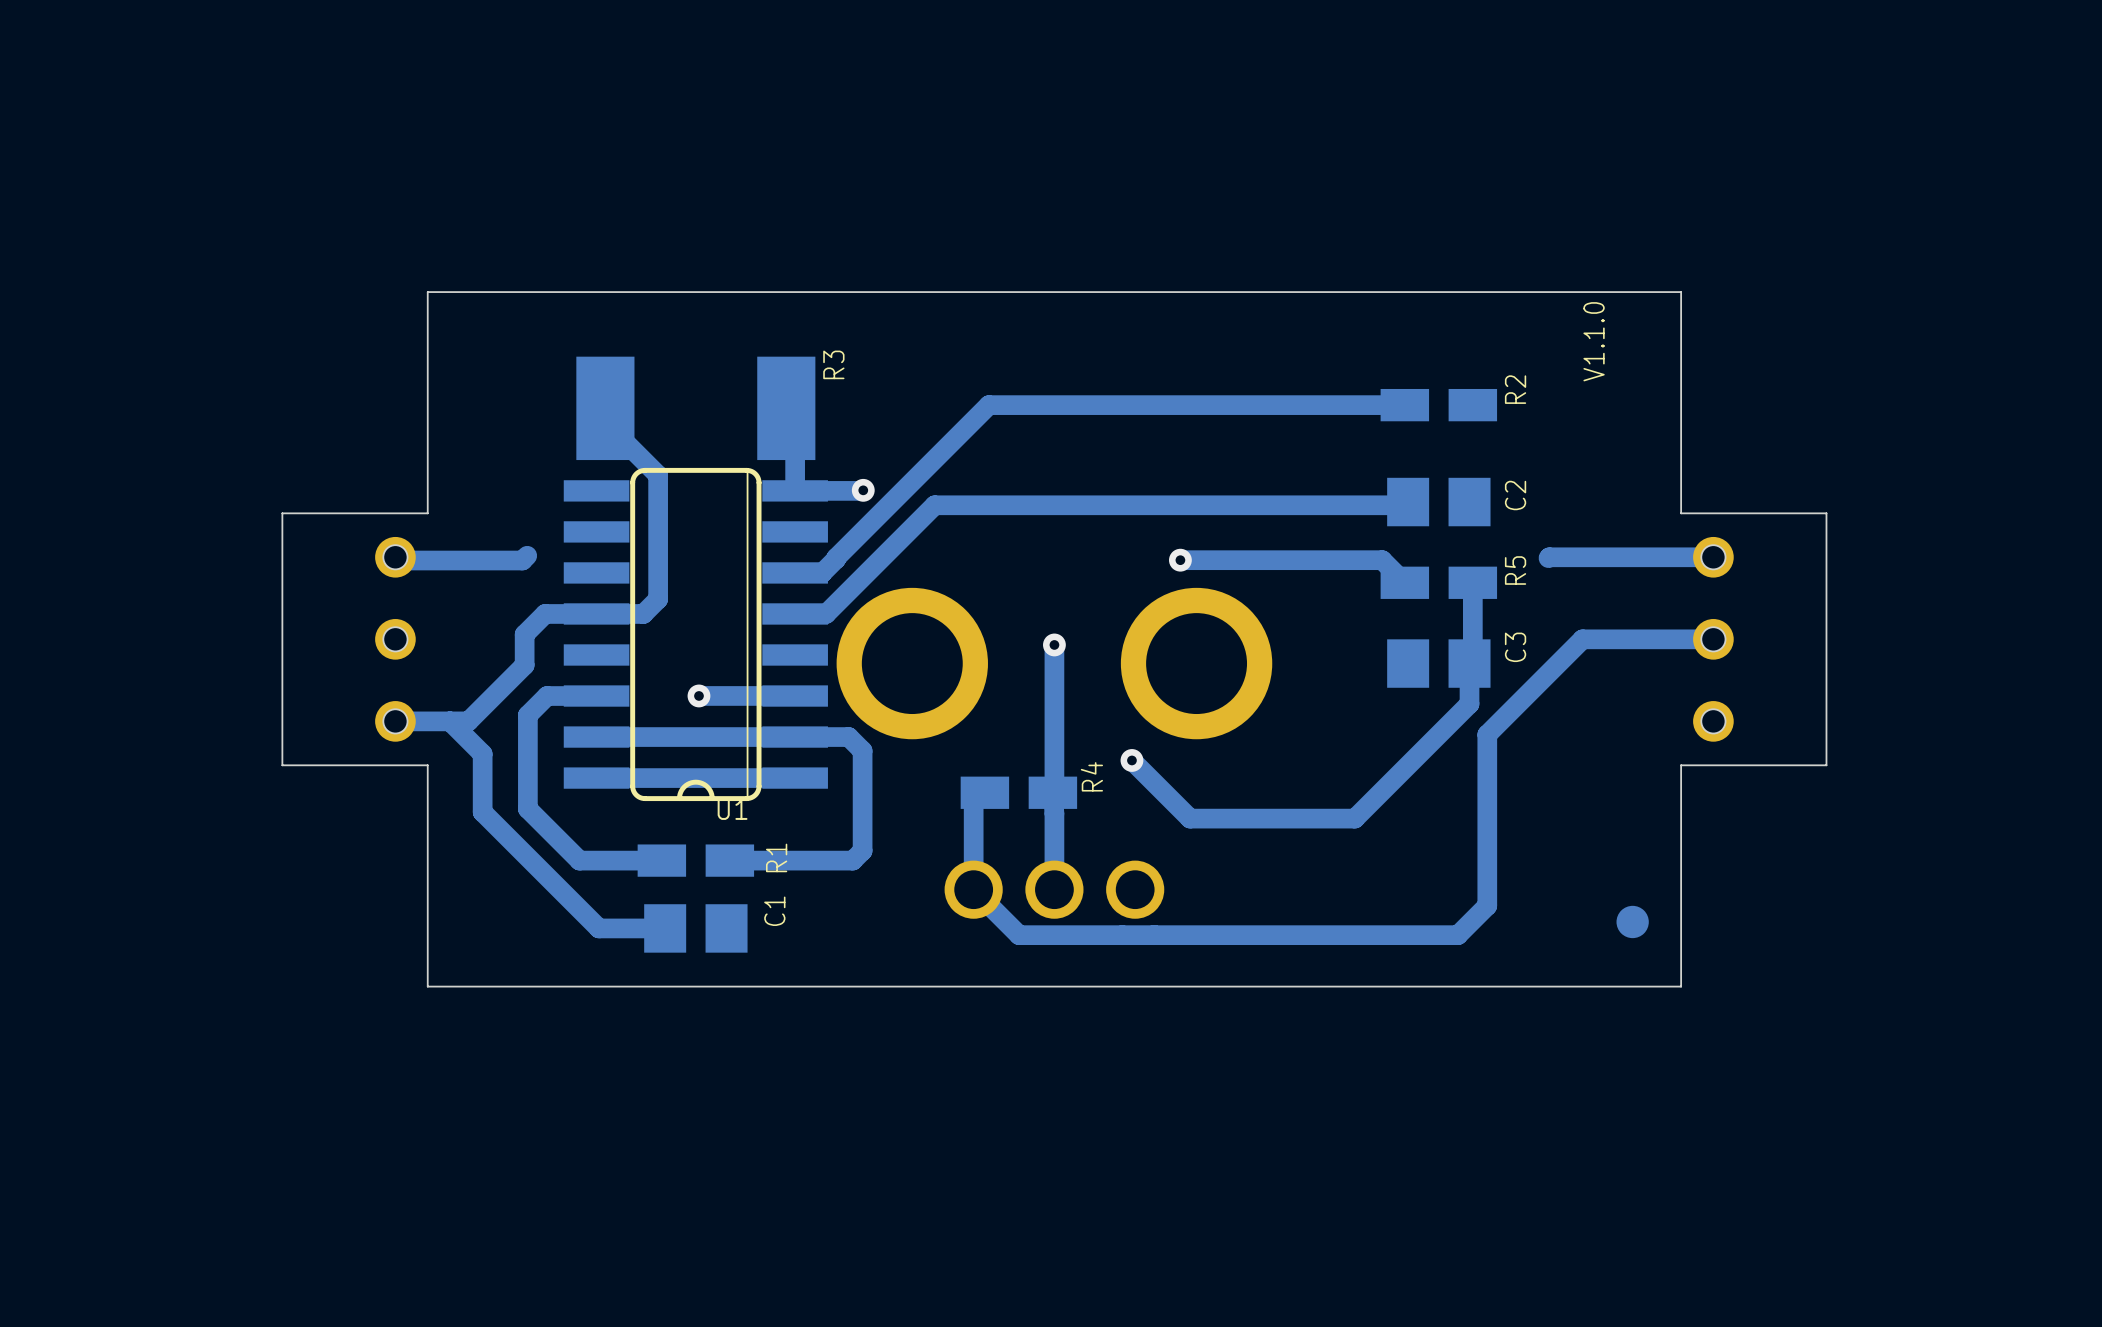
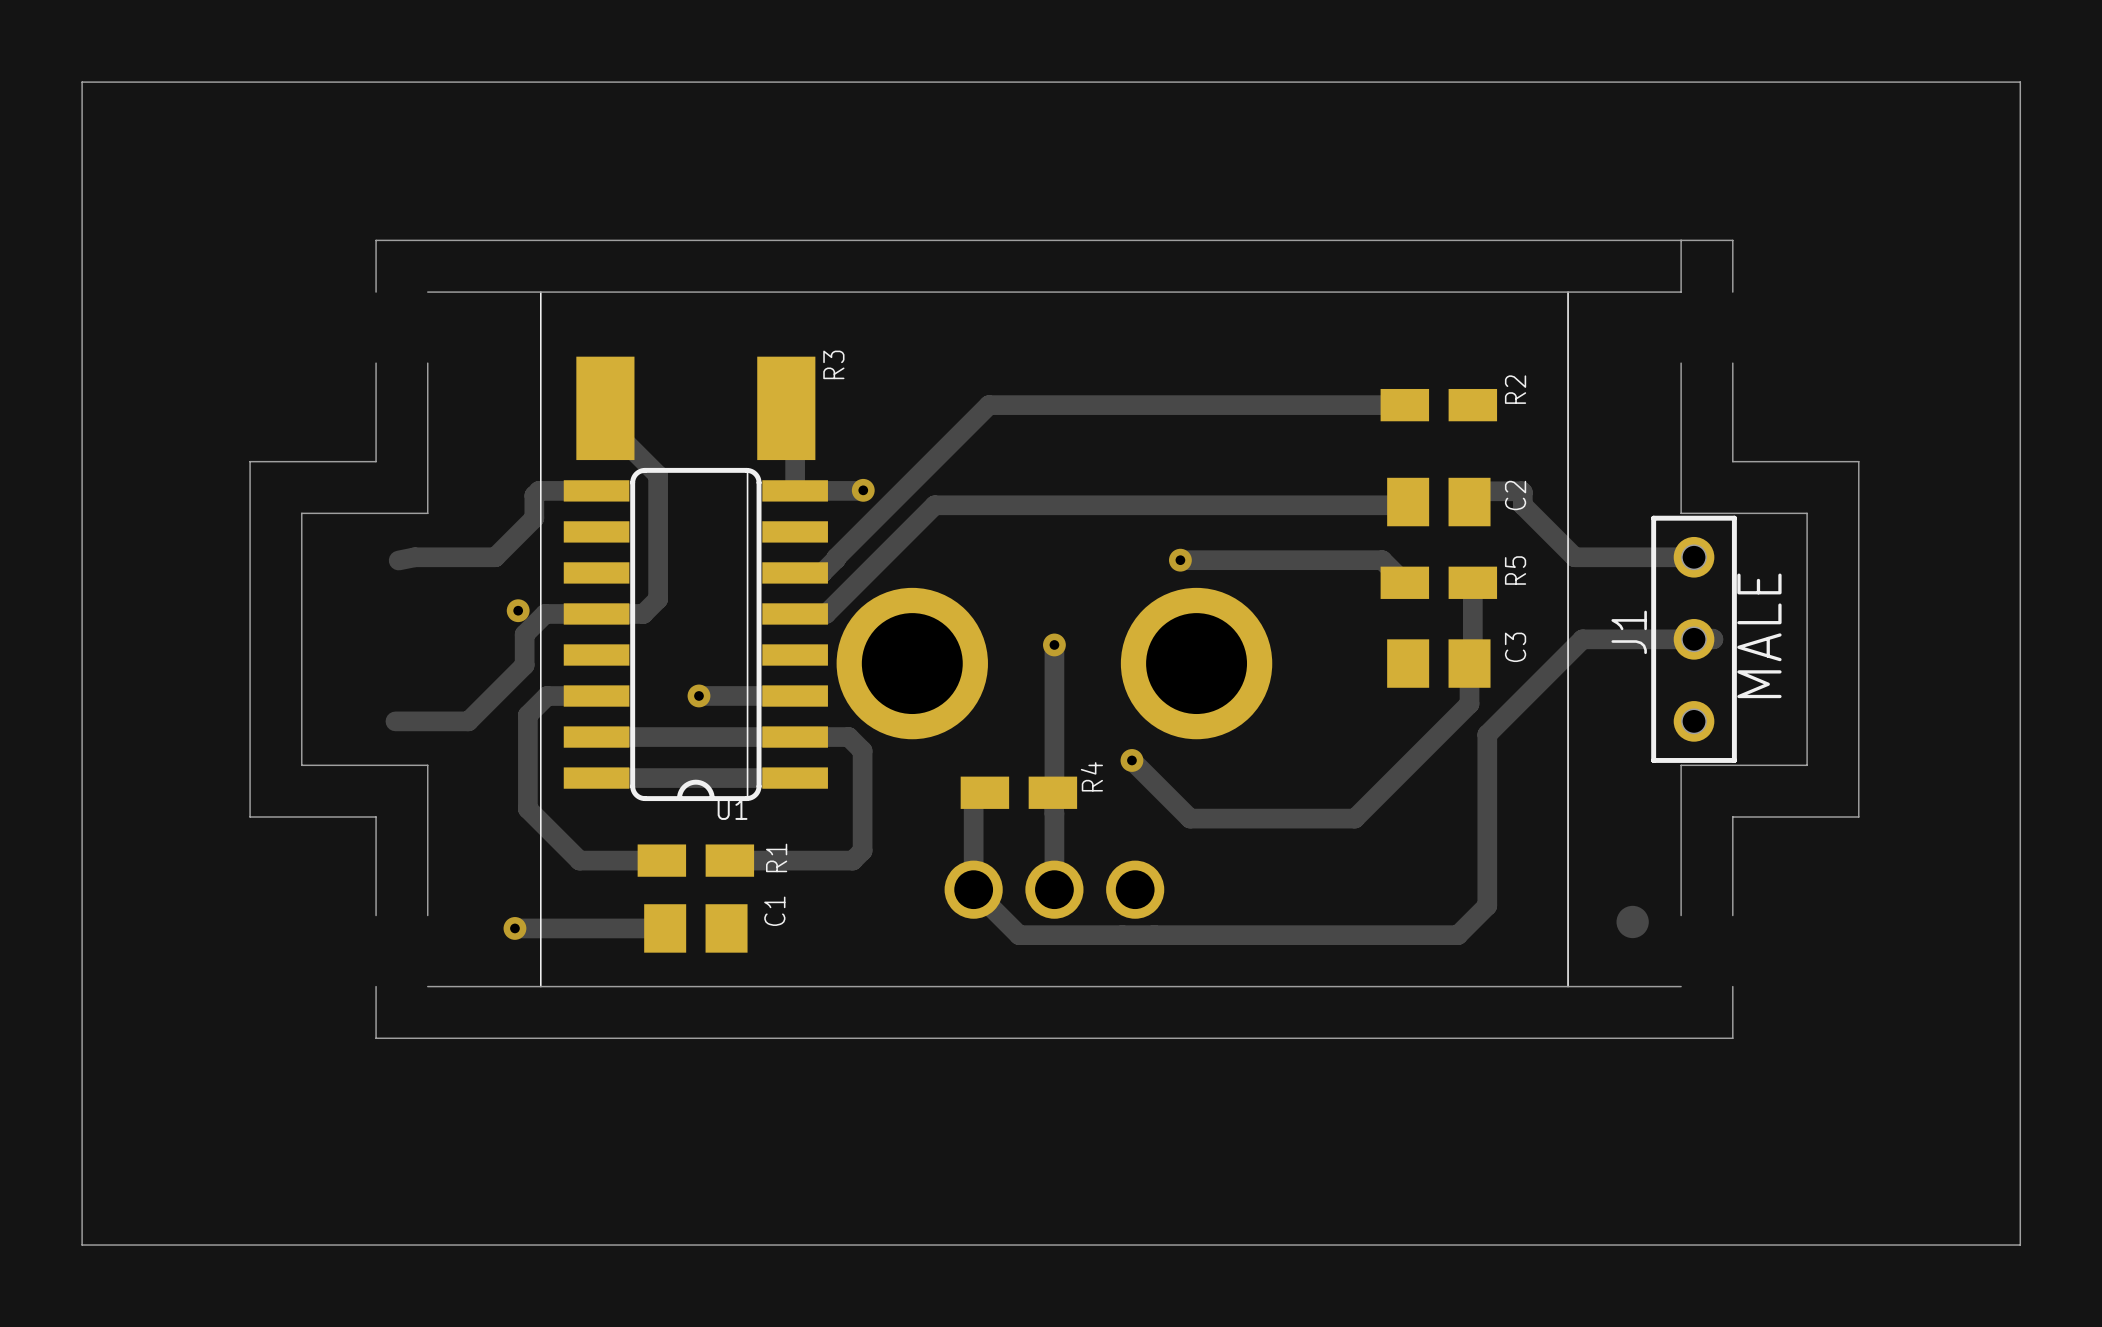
board edge: none -> (2020, 82) (2020, 1245) (82, 1245) (82, 82) (2020, 82)
board edge: (427, 292) (427, 363) -> none
line: none -> (540, 292) (540, 986)
line: none -> (1568, 292) (1568, 986)
board edge: (1681, 292) (1681, 363) -> (1681, 292) (1681, 240)
board edge: none -> (1732, 292) (1732, 240) (376, 240) (376, 292)
text: V1.1.0 (1594, 341) -> none
board edge: none -> (376, 363) (376, 461) (250, 461) (250, 816) (376, 816) (376, 915)
board edge: none -> (1732, 363) (1732, 461) (1858, 461) (1858, 816) (1732, 816) (1732, 915)
track: none -> (596, 490) (539, 490) (534, 495) (534, 518) (495, 557) (414, 557) (398, 560)
board edge: (301, 513) (282, 513) (282, 765) (301, 765) -> (301, 513) (301, 765)
board edge: (1807, 513) (1826, 513) (1826, 765) (1807, 765) -> (1807, 513) (1807, 765)
track: (527, 555) (522, 560) (398, 560) (395, 557) -> none
track: (1574, 557) (1548, 558) -> (1574, 557) (1522, 505) (1521, 491) (1469, 491)
via: none -> (518, 610)
part: (395, 639) -> none
J1: none -> (1694, 639)
part: (1713, 639) -> none
track: (450, 721) (482, 754) (482, 812) (598, 928) -> (514, 928) (598, 928)
board edge: (427, 915) (427, 986) -> none
board edge: (1681, 915) (1681, 986) -> none
via: none -> (514, 928)
board edge: none -> (1732, 986) (1732, 1038) (376, 1038) (376, 986)

